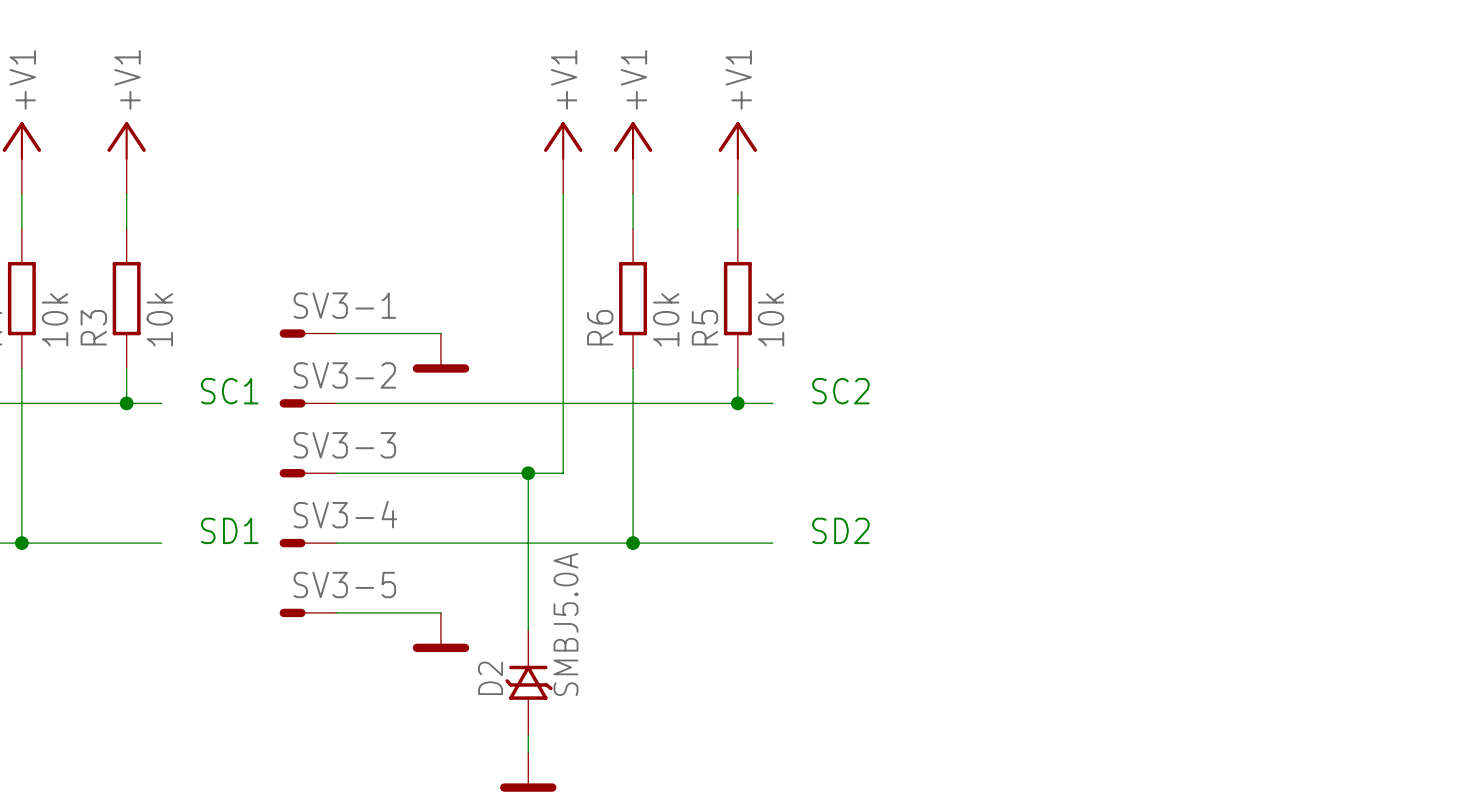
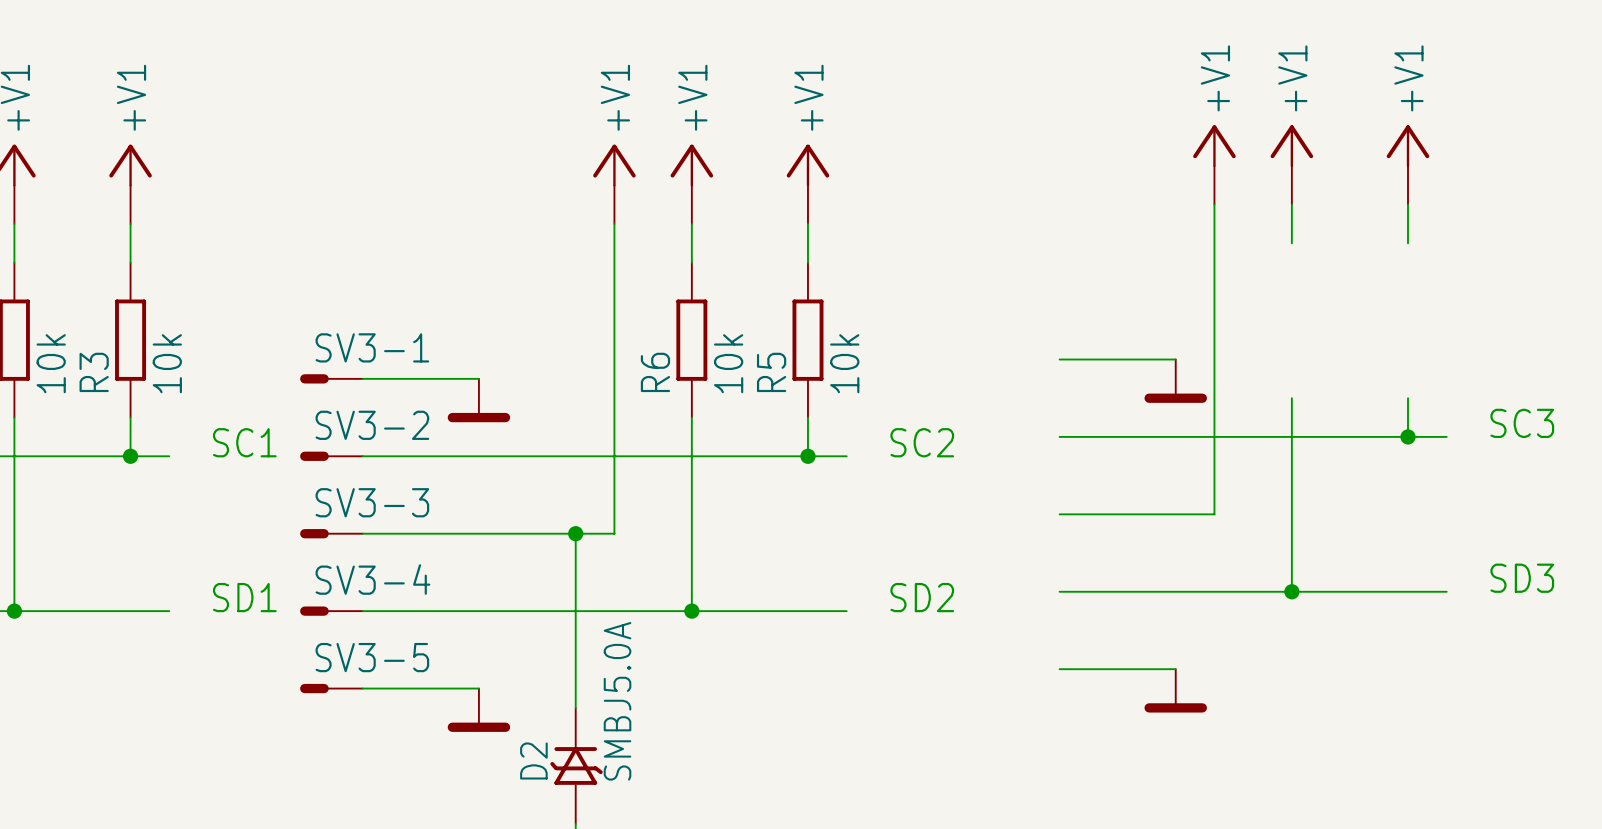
power symbol: none -> +V1 (1214, 164)
power symbol: none -> +V1 (1291, 164)
power symbol: none -> +V1 (1408, 164)
wire: none -> (1214, 204) (1214, 514) (1059, 514)
wire: none -> (1291, 204) (1291, 243)
wire: none -> (1408, 204) (1408, 243)
wire: none -> (1059, 359) (1175, 359)
power symbol: none -> (1175, 381)
wire: none -> (1291, 398) (1291, 591)
wire: none -> (1408, 398) (1408, 436)
text: none -> SC3 (1522, 423)
wire: none -> (1059, 436) (1446, 436)
junction: none -> (1408, 436)
text: none -> SD3 (1522, 578)
wire: none -> (1059, 591) (1446, 591)
junction: none -> (1291, 591)
wire: none -> (1059, 669) (1175, 669)
power symbol: none -> (1175, 690)

